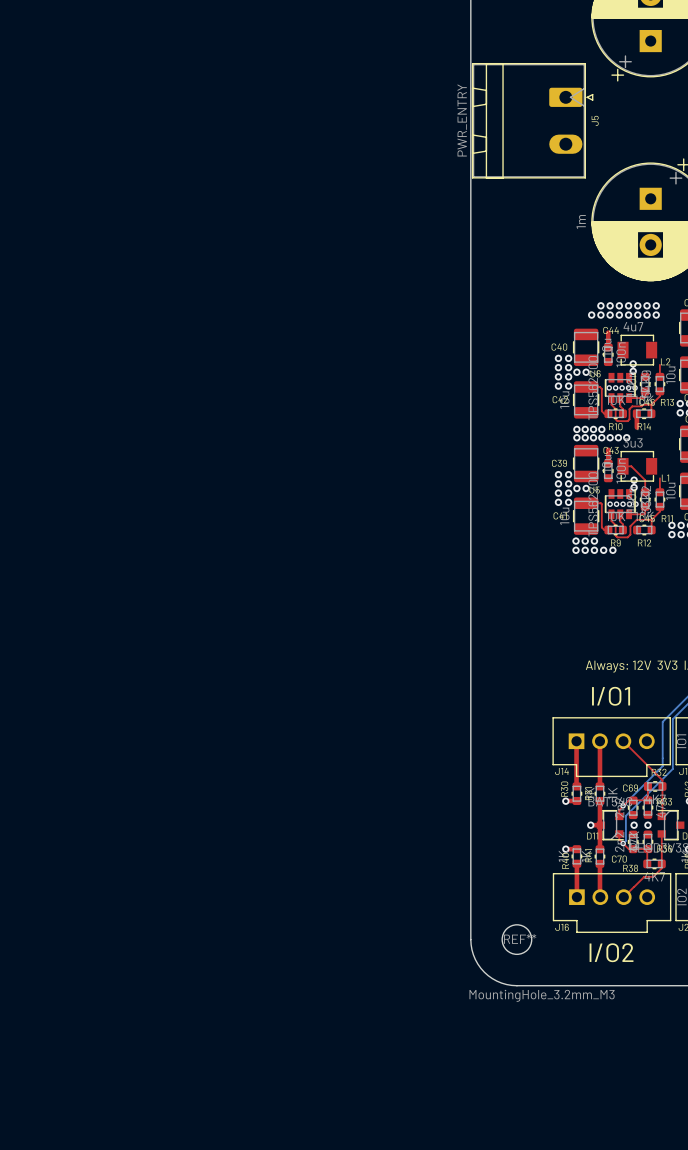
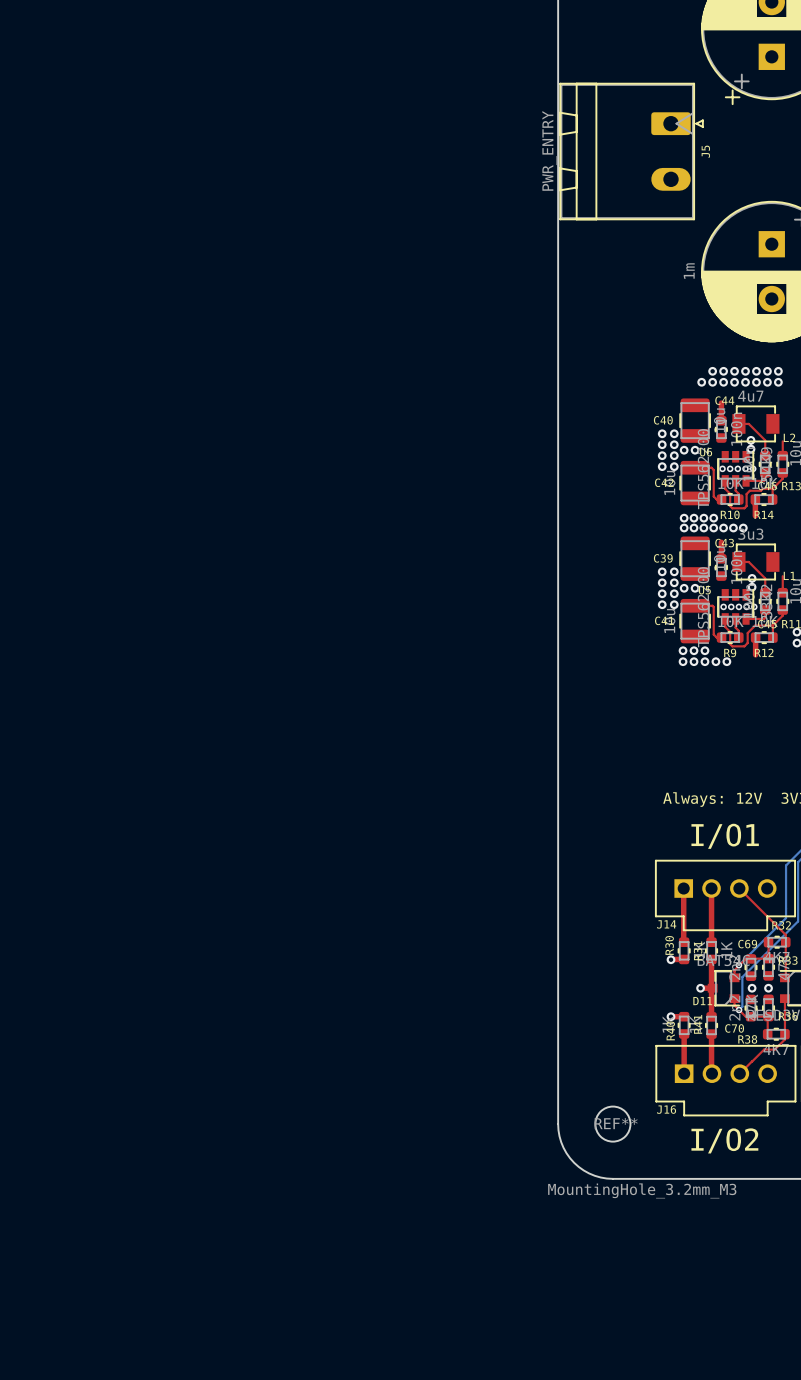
top track: none -> (745, 423) (748, 423) (765, 440) (765, 455)
top track: none -> (755, 637) (755, 654)

